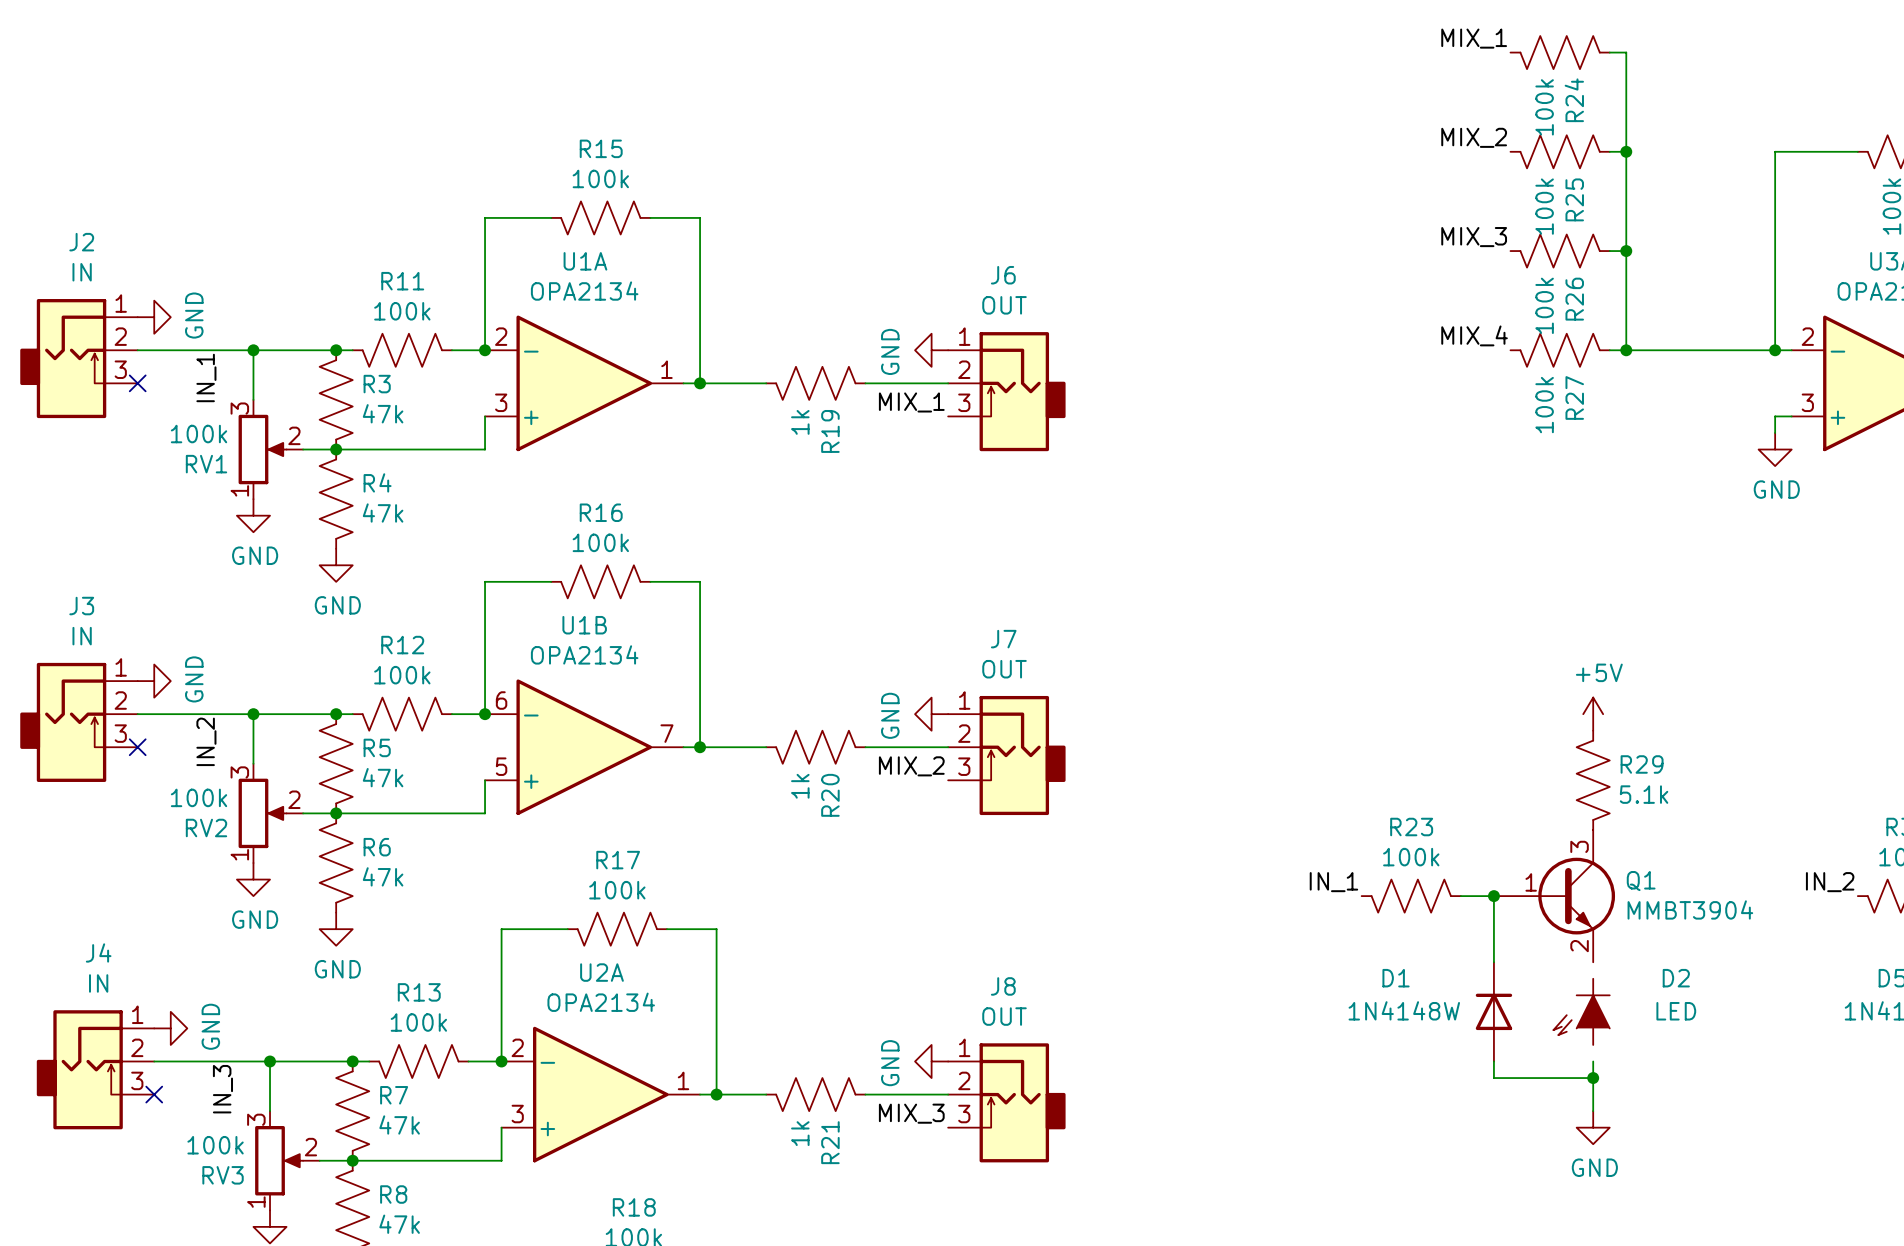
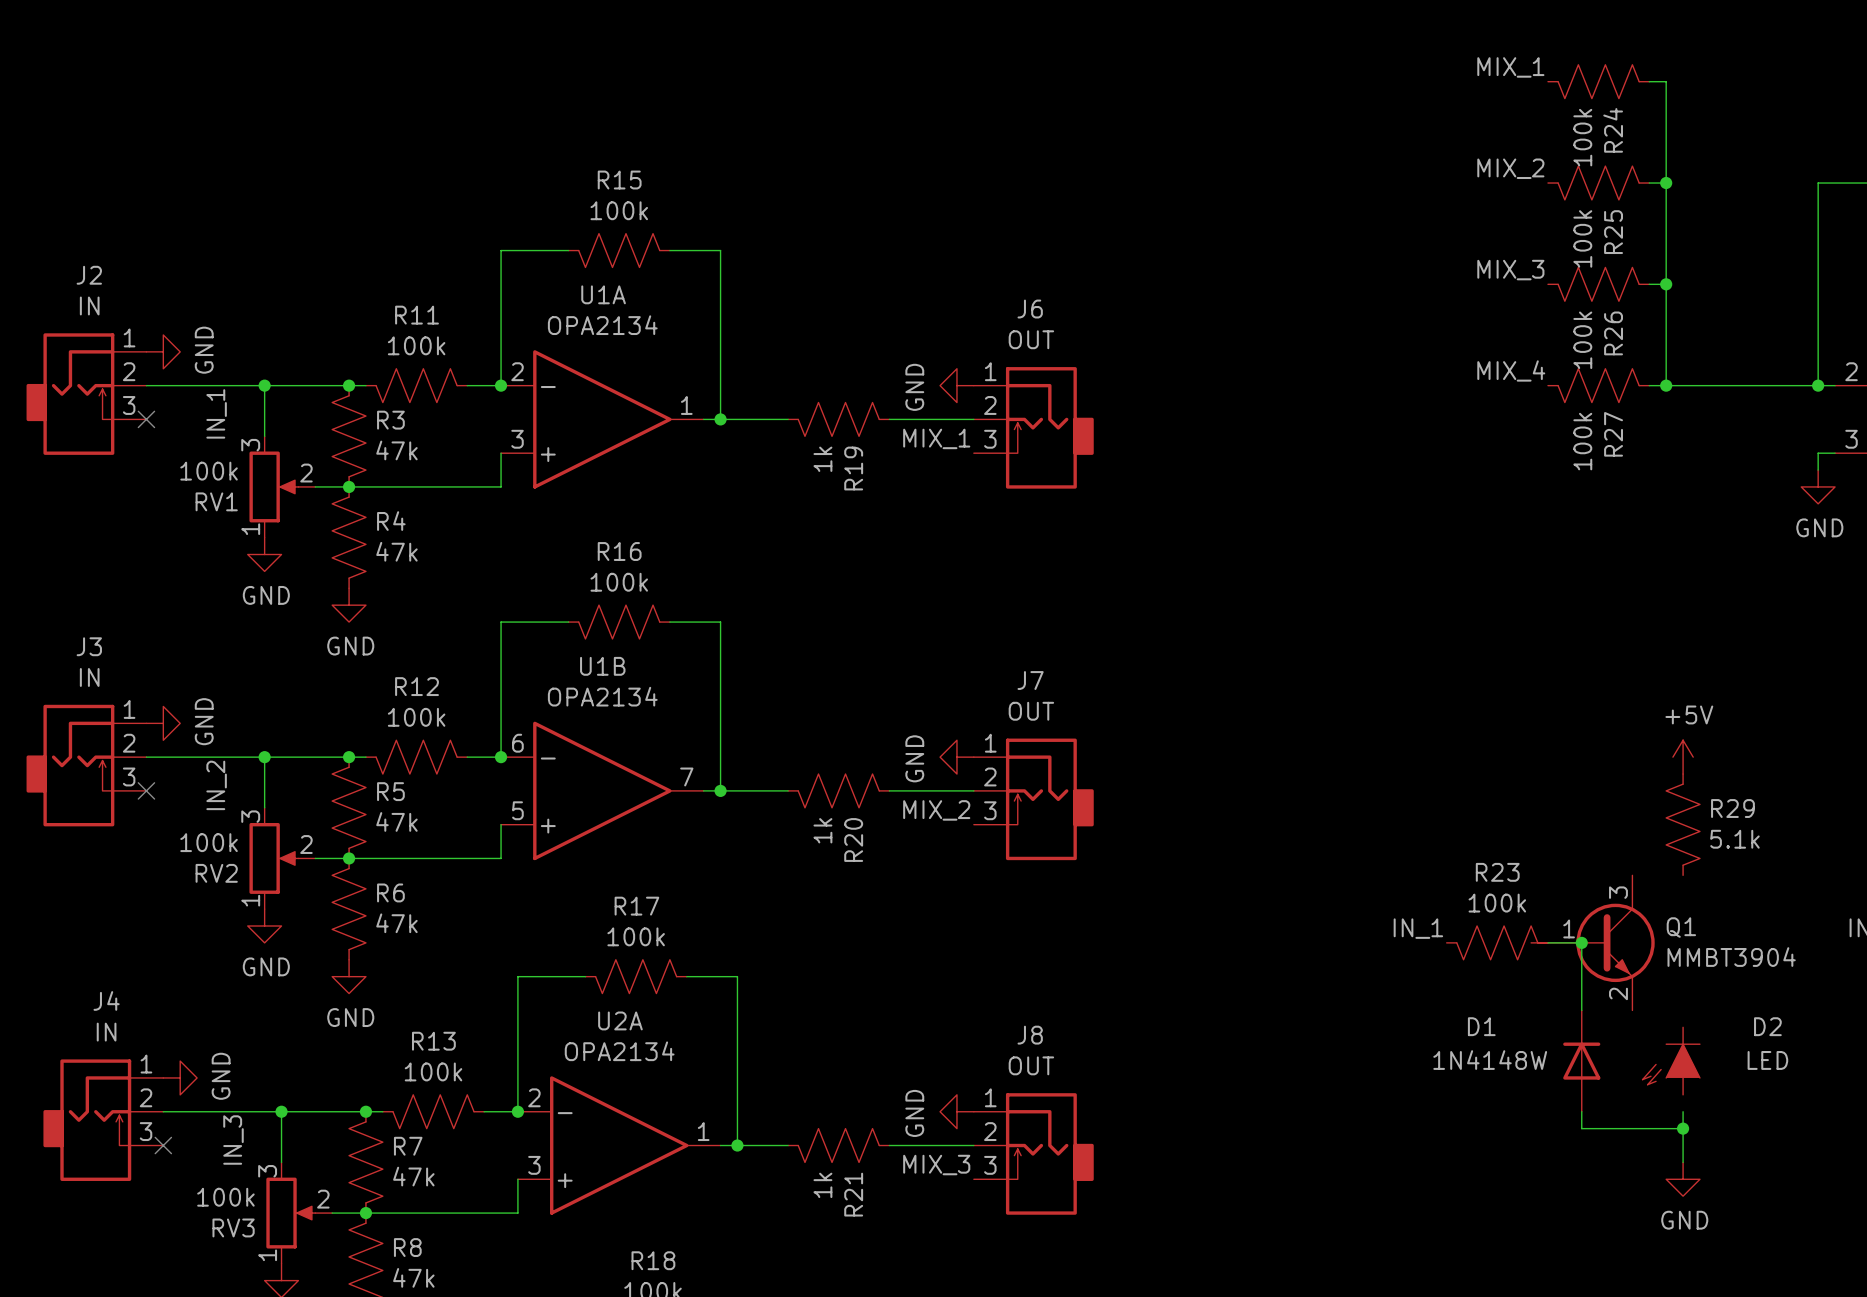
power symbol position: +5V (1593, 714) -> +5V (1683, 757)
R29 position: (1593, 780) -> (1683, 824)
label position: IN_1 (1333, 882) -> IN_1 (1418, 928)
R23 position: (1411, 896) -> (1497, 942)
wire: (1460, 896) (1493, 896) (1493, 962) -> (1547, 942) (1581, 942) (1581, 1010)
junction position: (1493, 896) -> (1581, 942)
D1 position: (1493, 1011) -> (1581, 1061)
D2 position: (1581, 1011) -> (1671, 1061)
wire: (1493, 1061) (1493, 1078) (1543, 1078) -> (1581, 1111) (1581, 1128)
wire: (1593, 1061) (1593, 1111) -> (1683, 1111) (1683, 1162)
wire: none -> (1632, 1128) (1683, 1128)
junction position: (1593, 1078) -> (1683, 1128)
power symbol position: GND (1593, 1127) -> GND (1683, 1179)

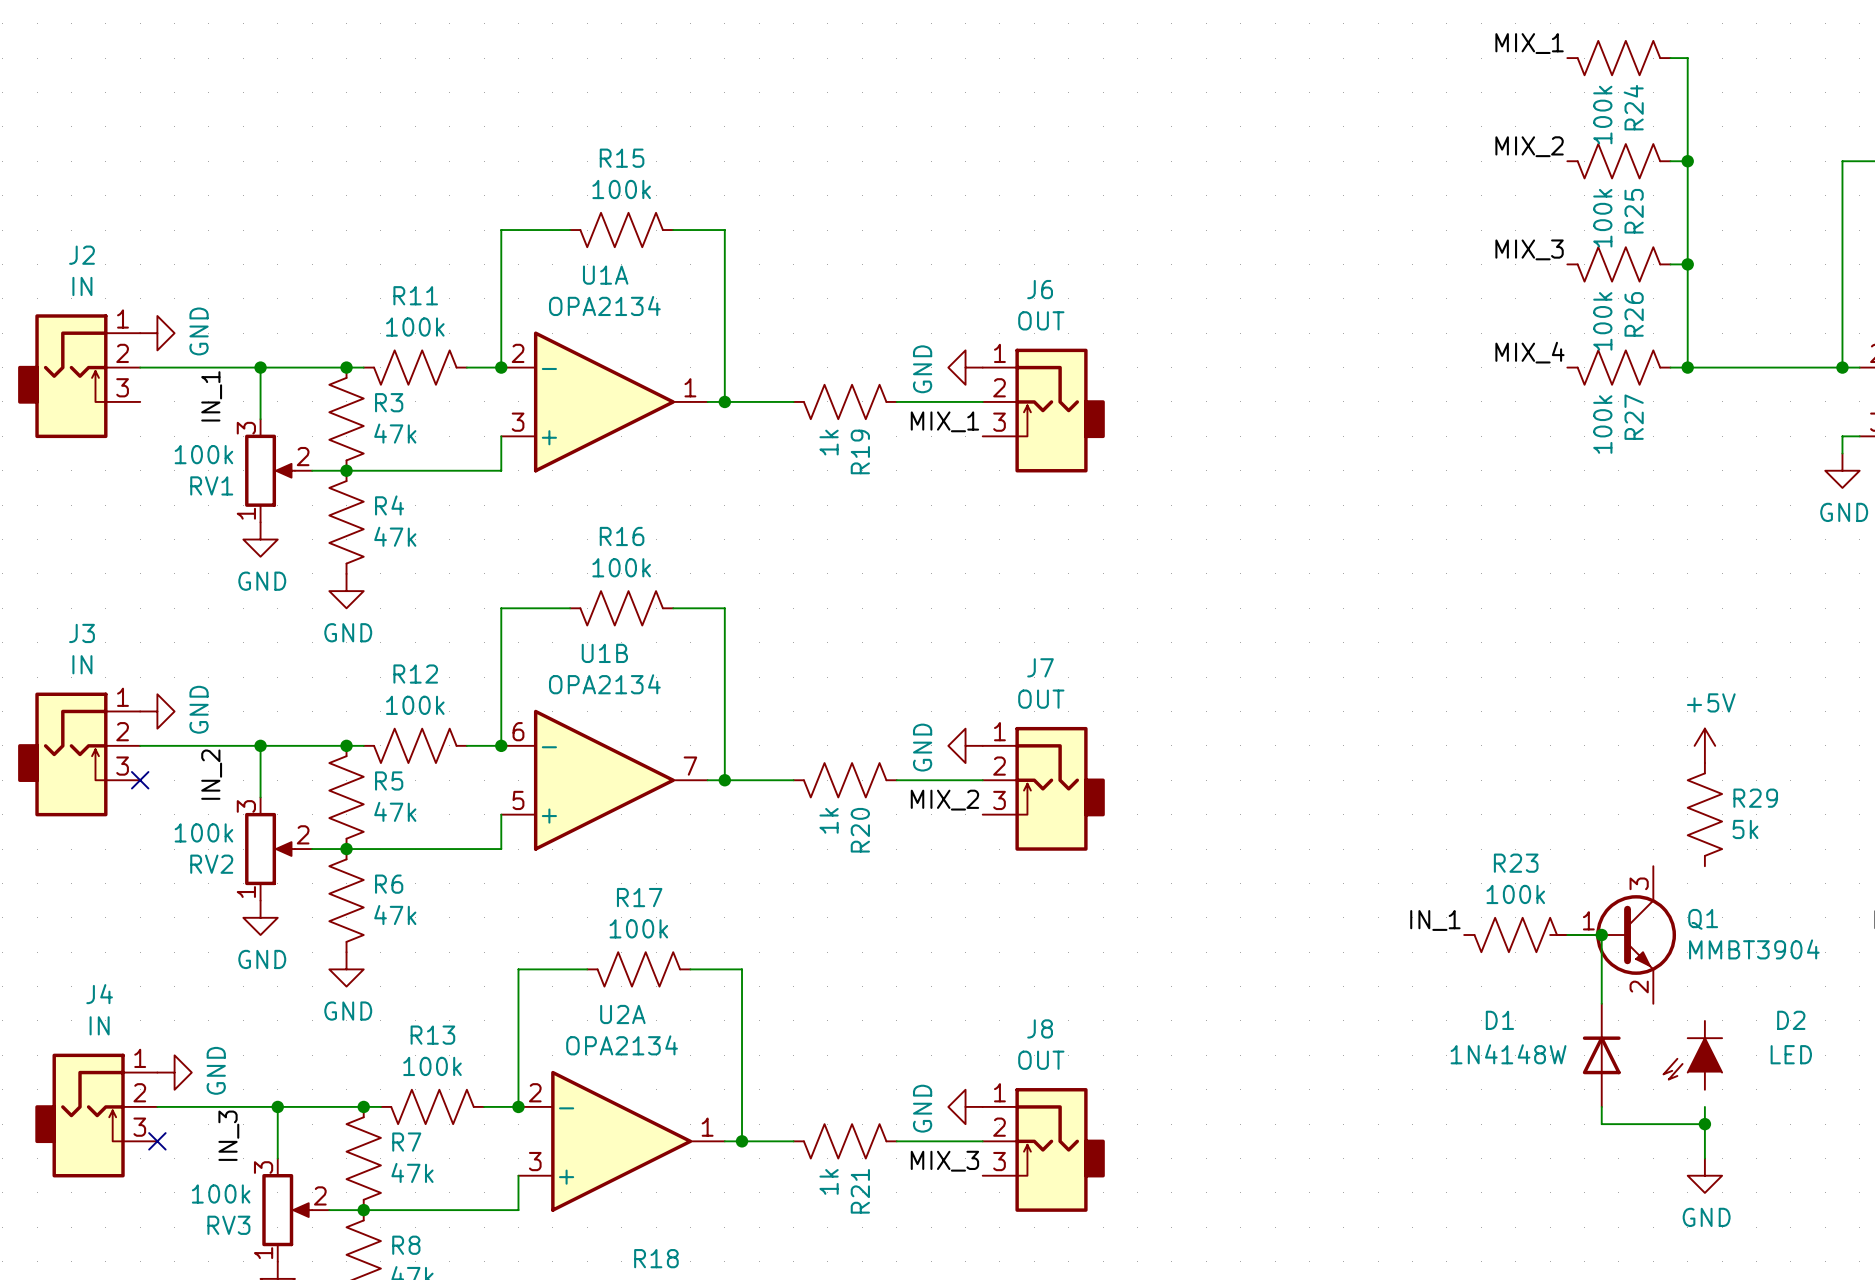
no-connect mark: (146, 419) -> none
R29 value: 5.1k (1734, 839) -> 5k (1745, 829)

